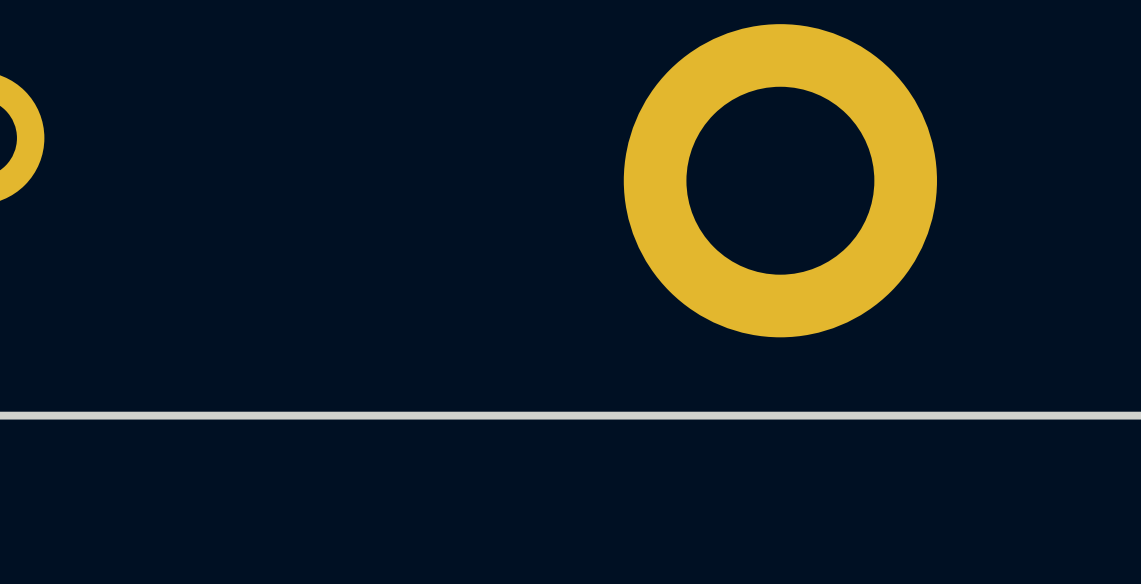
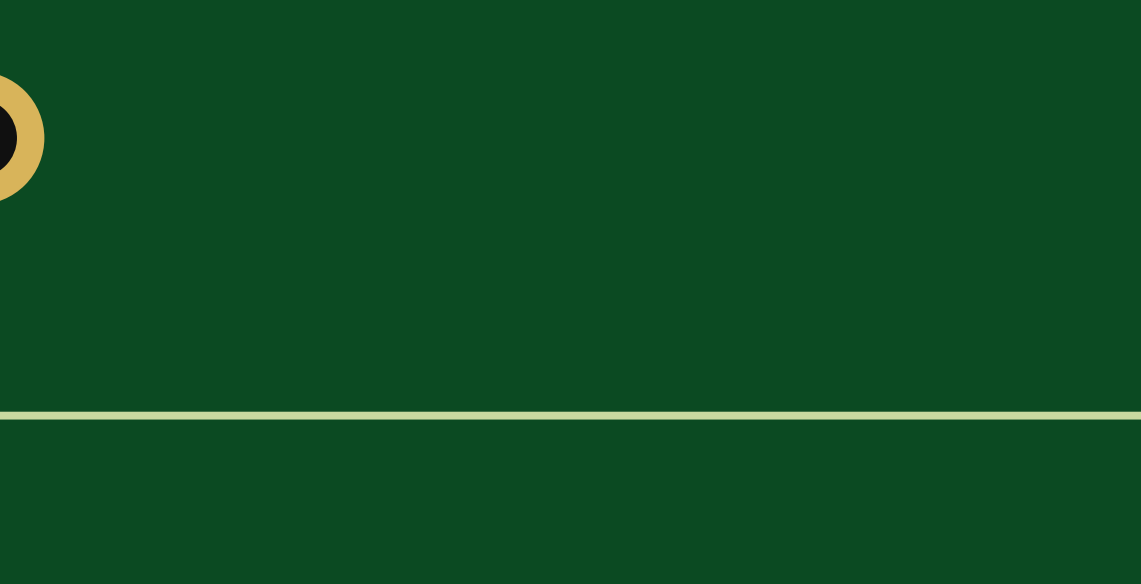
part: (780, 180) -> none

